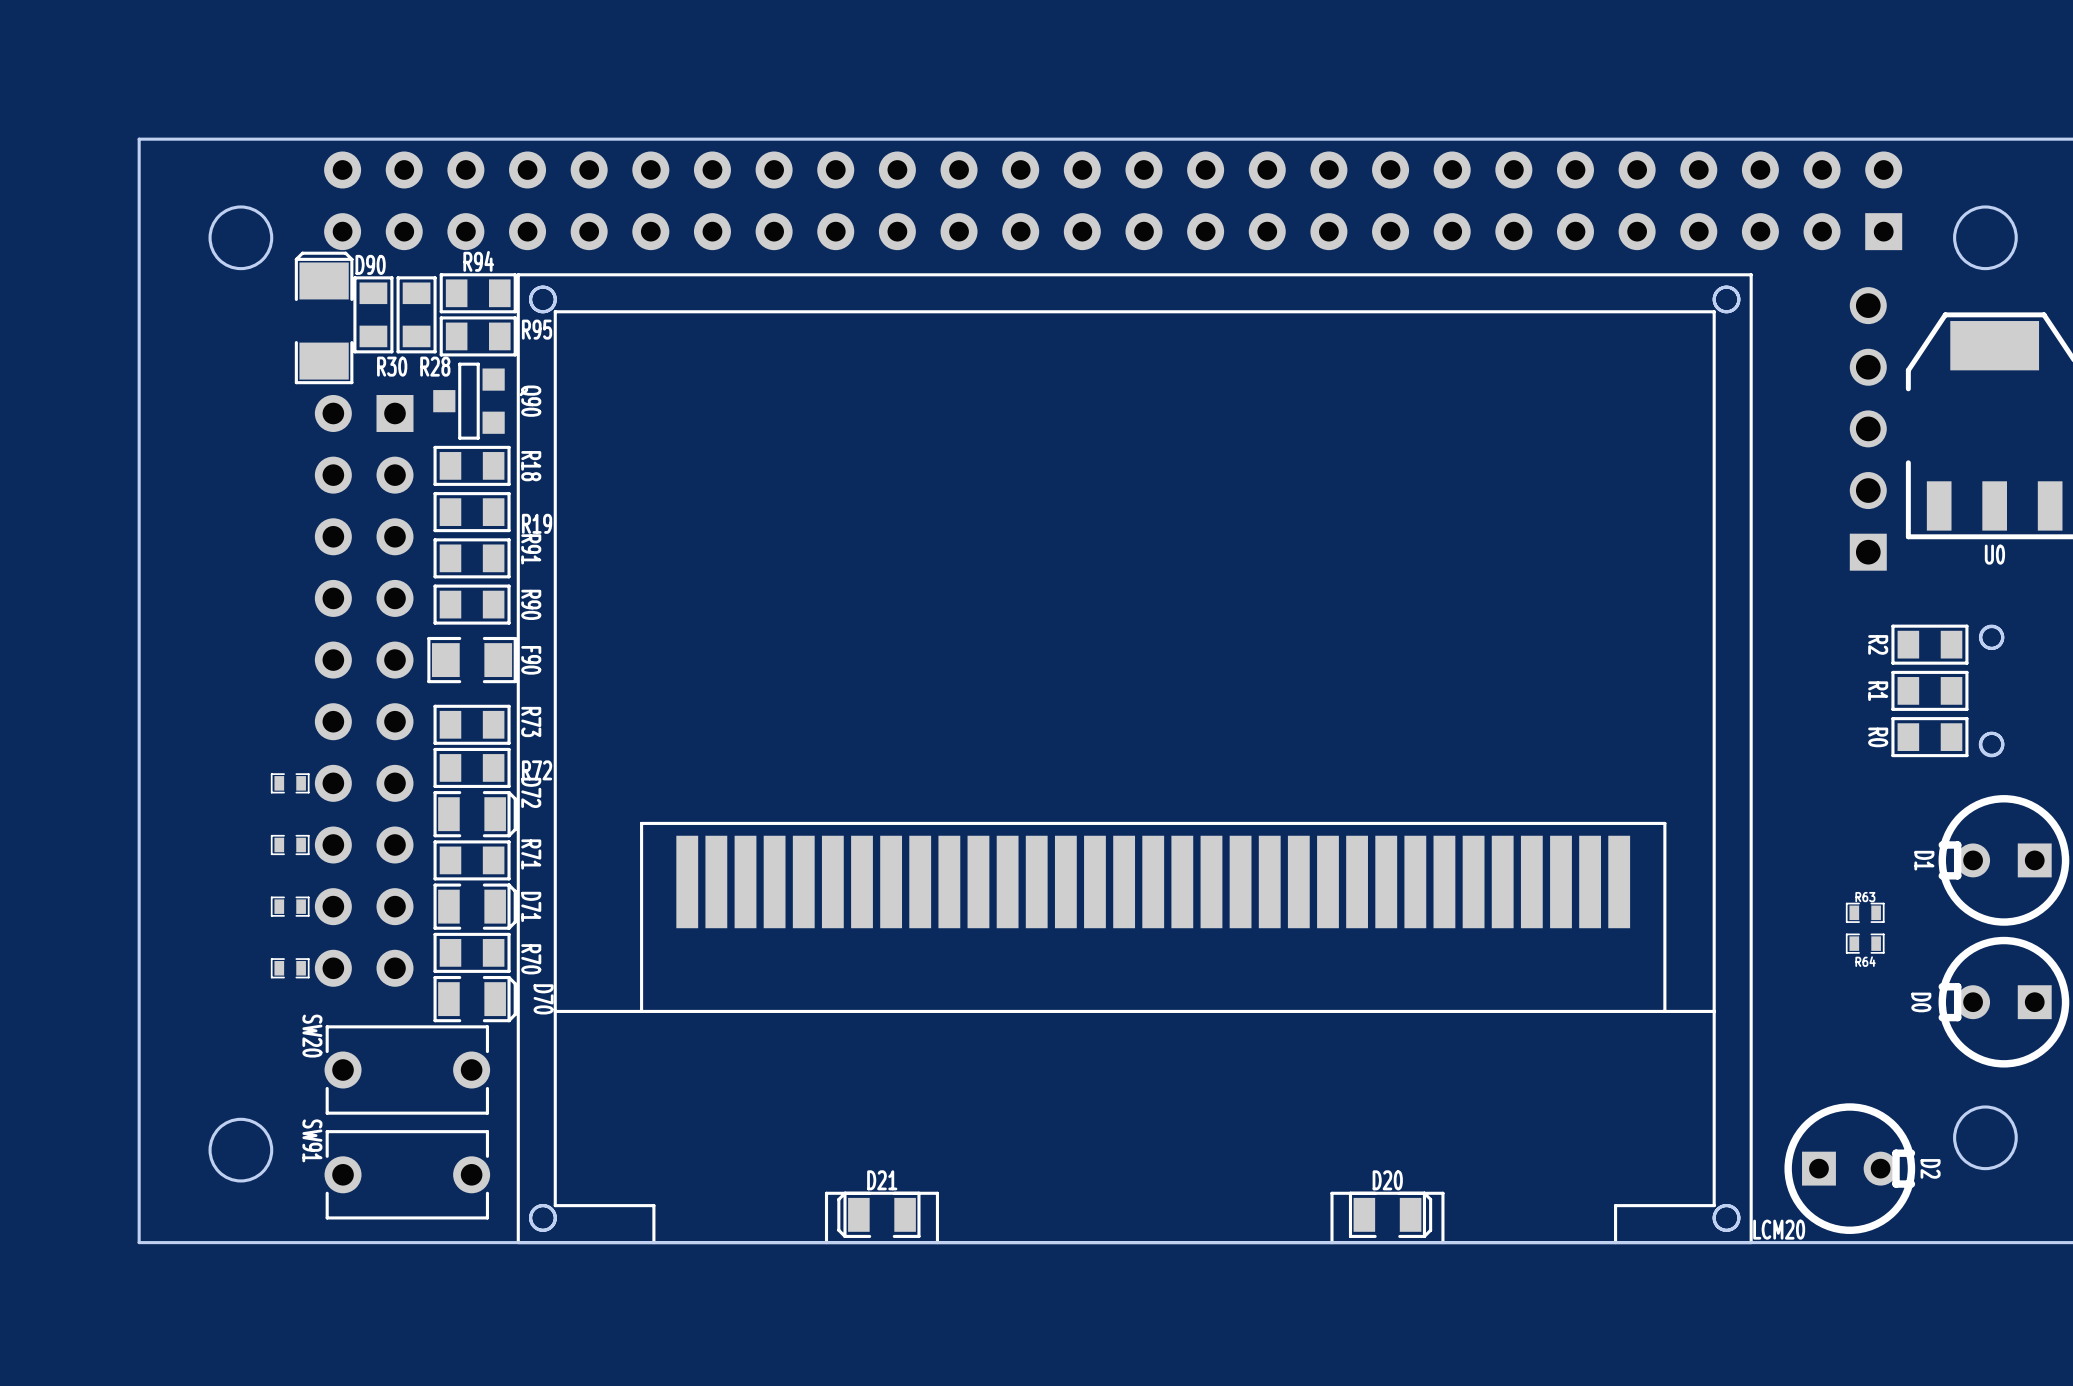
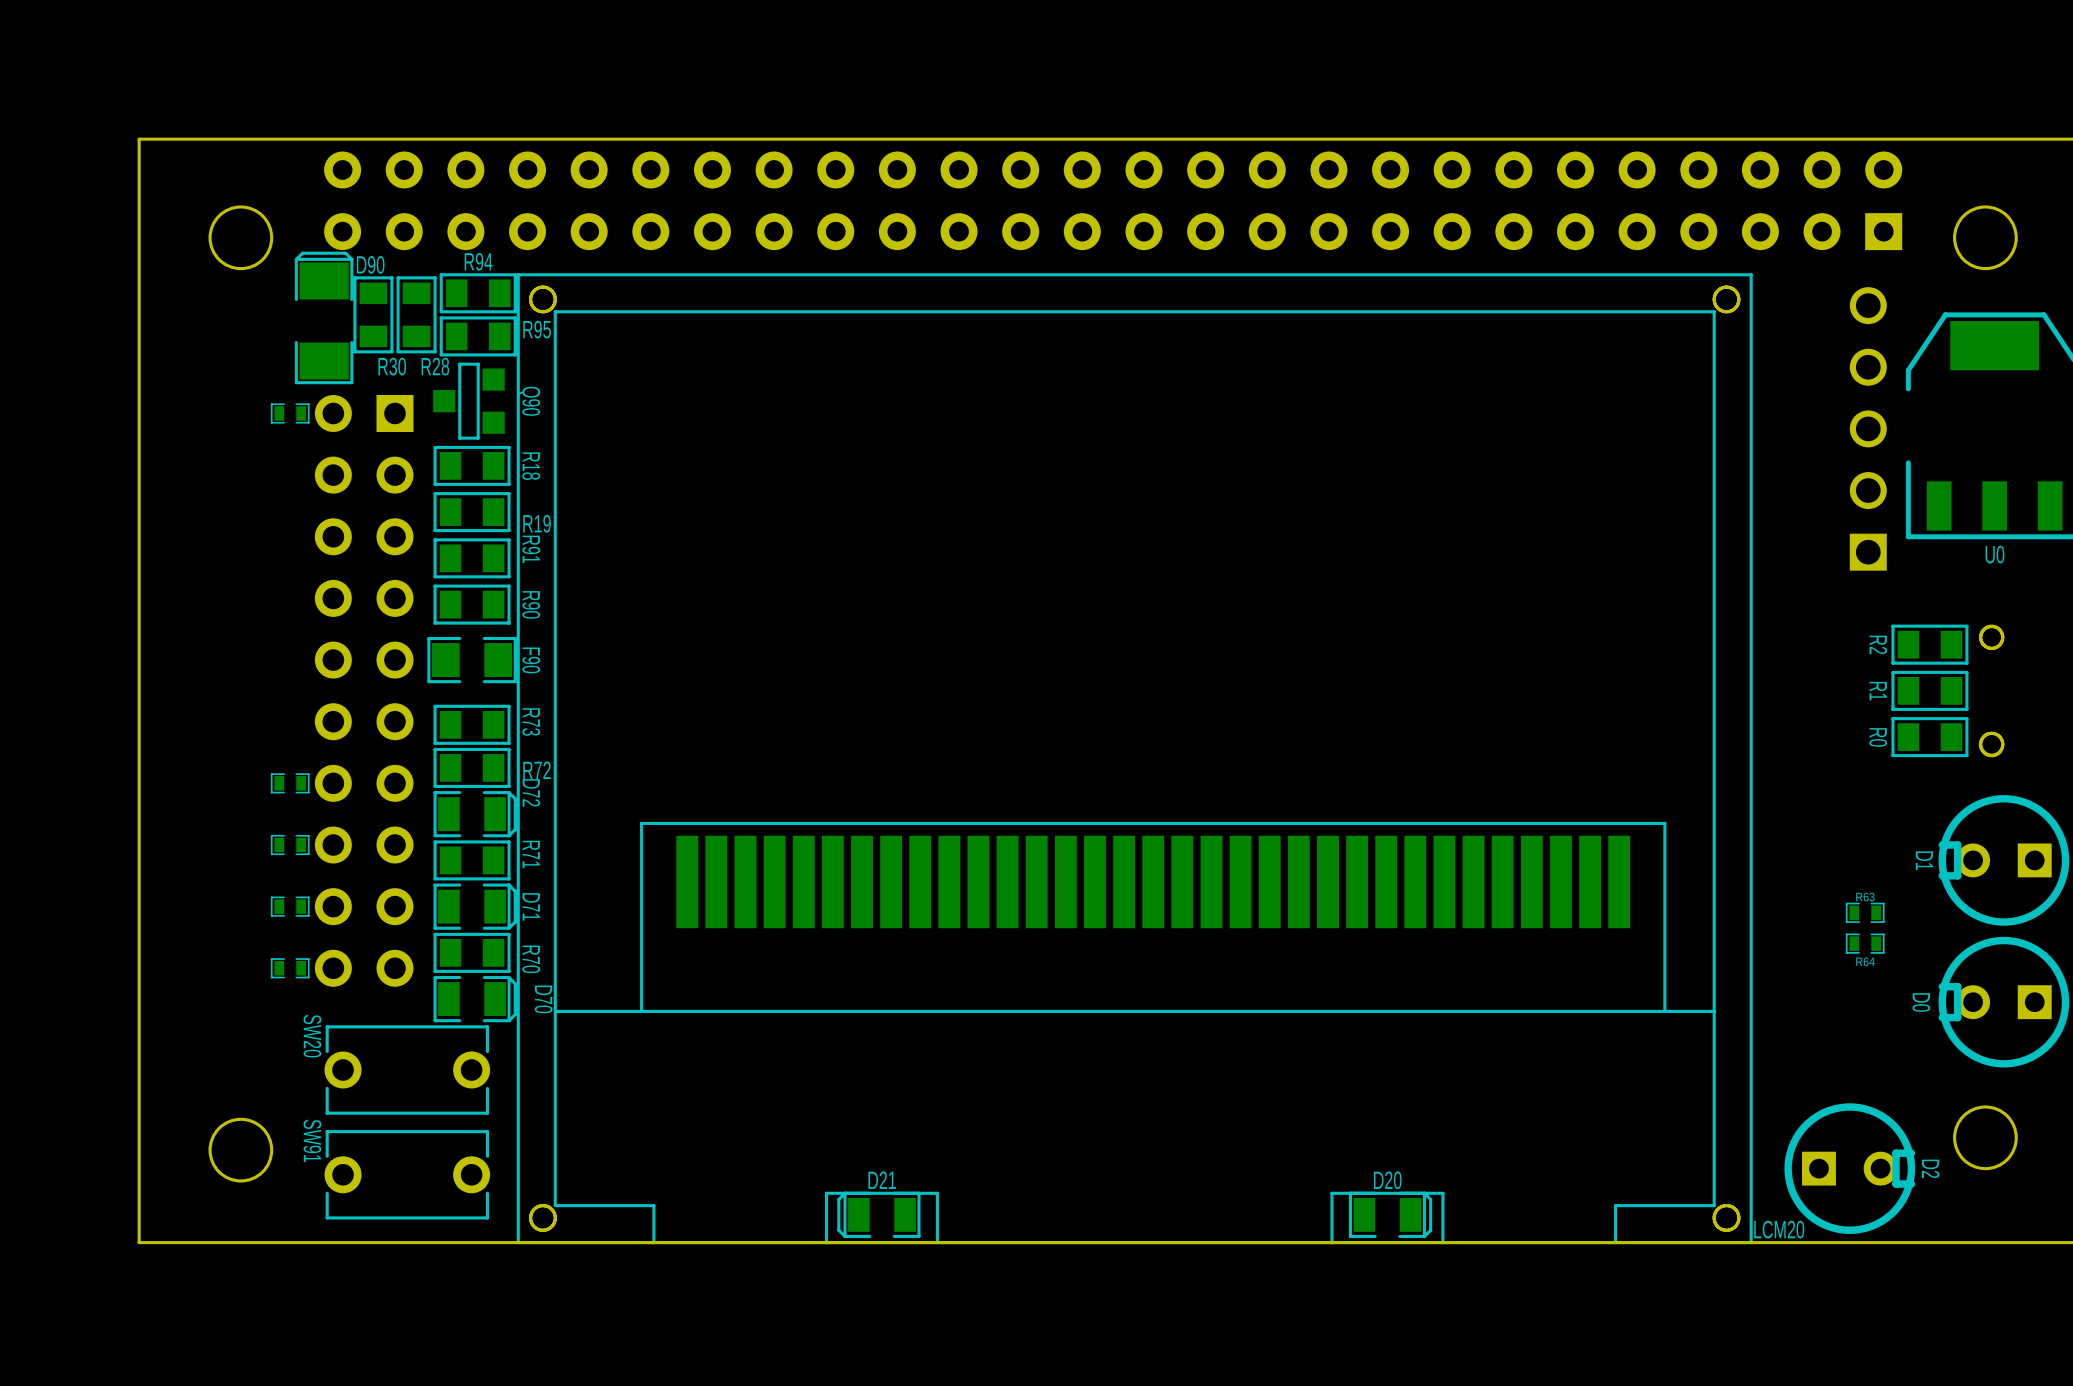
part: none -> (290, 413)

